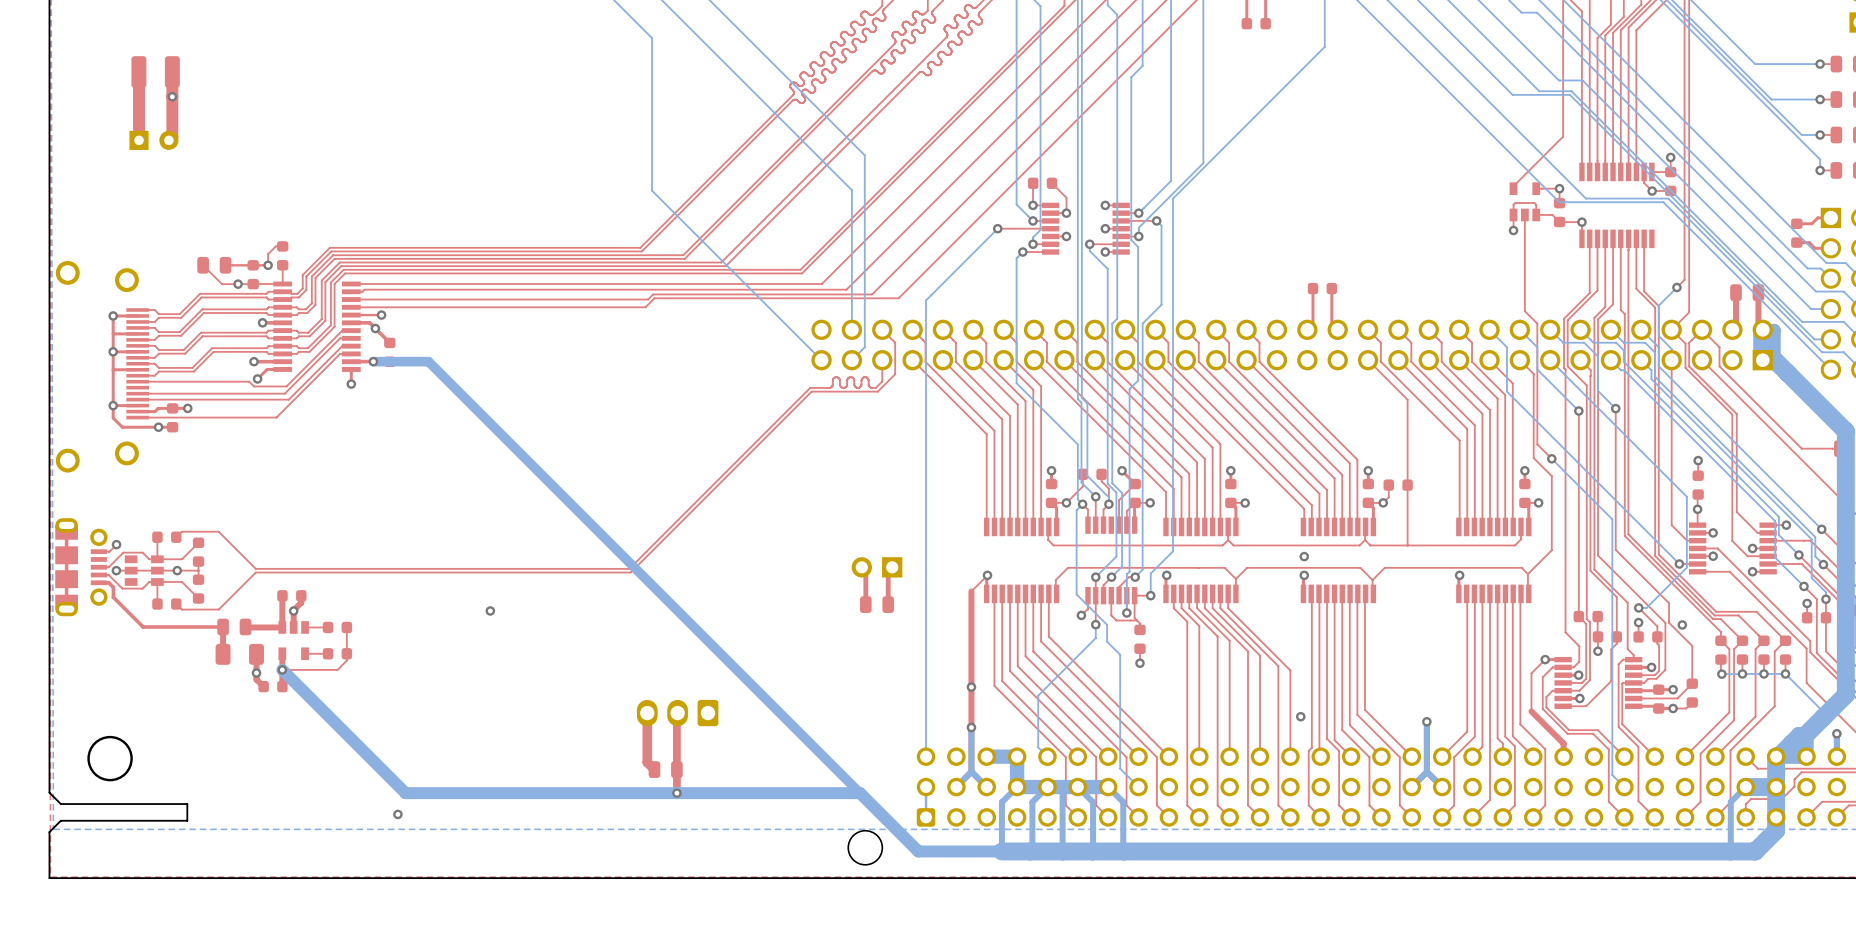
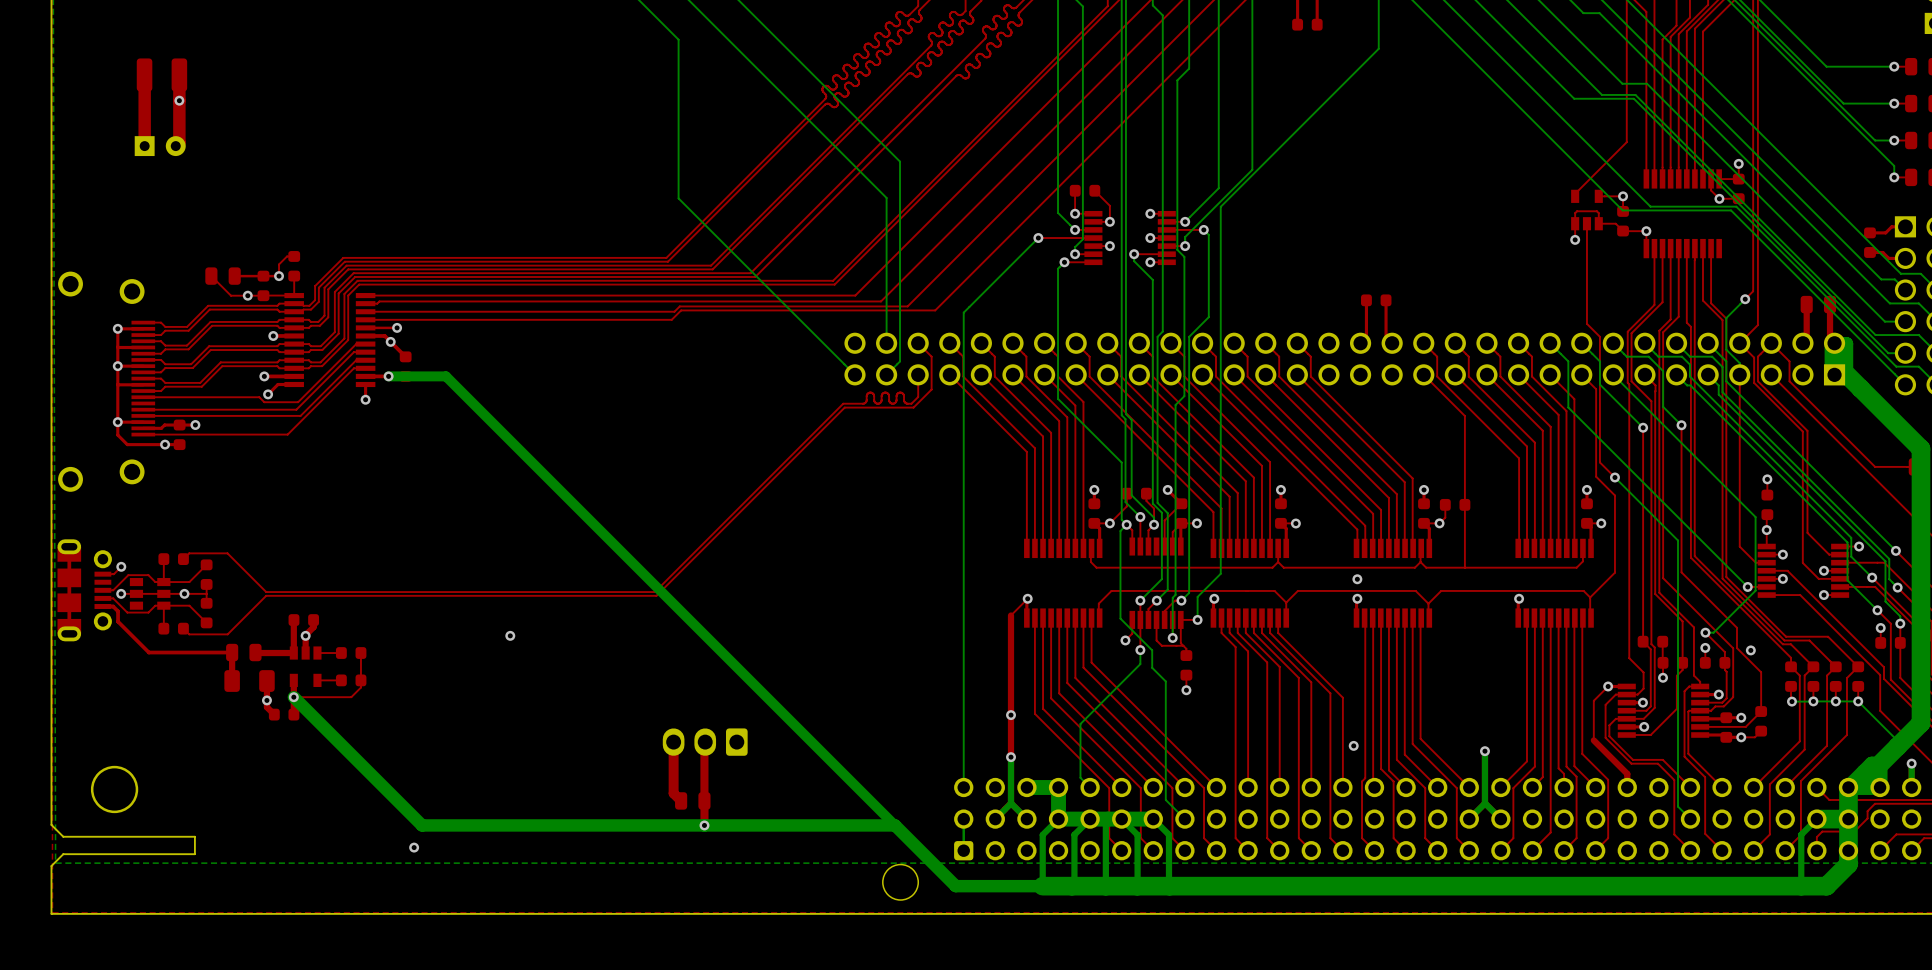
top track: (861, 567) (865, 571) (865, 604) -> none
part: (877, 567) -> none
top track: (892, 567) (888, 571) (888, 604) -> none
part: (877, 604) -> none

